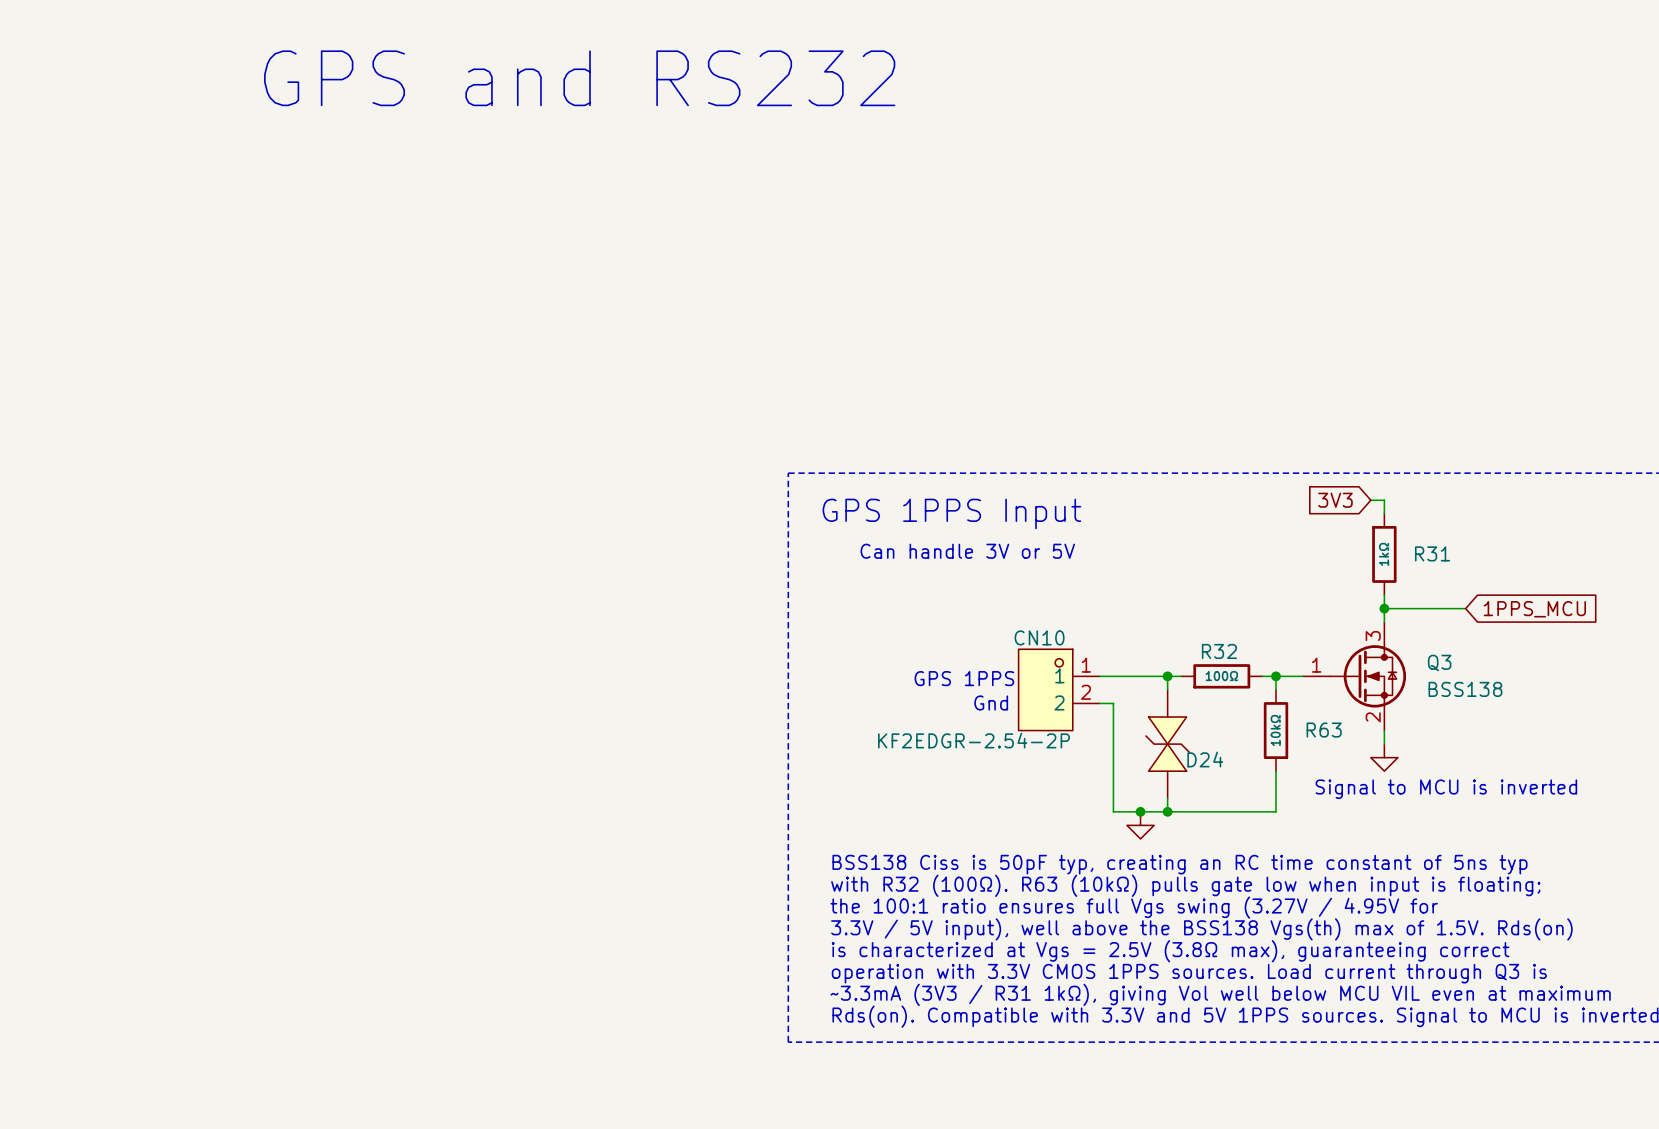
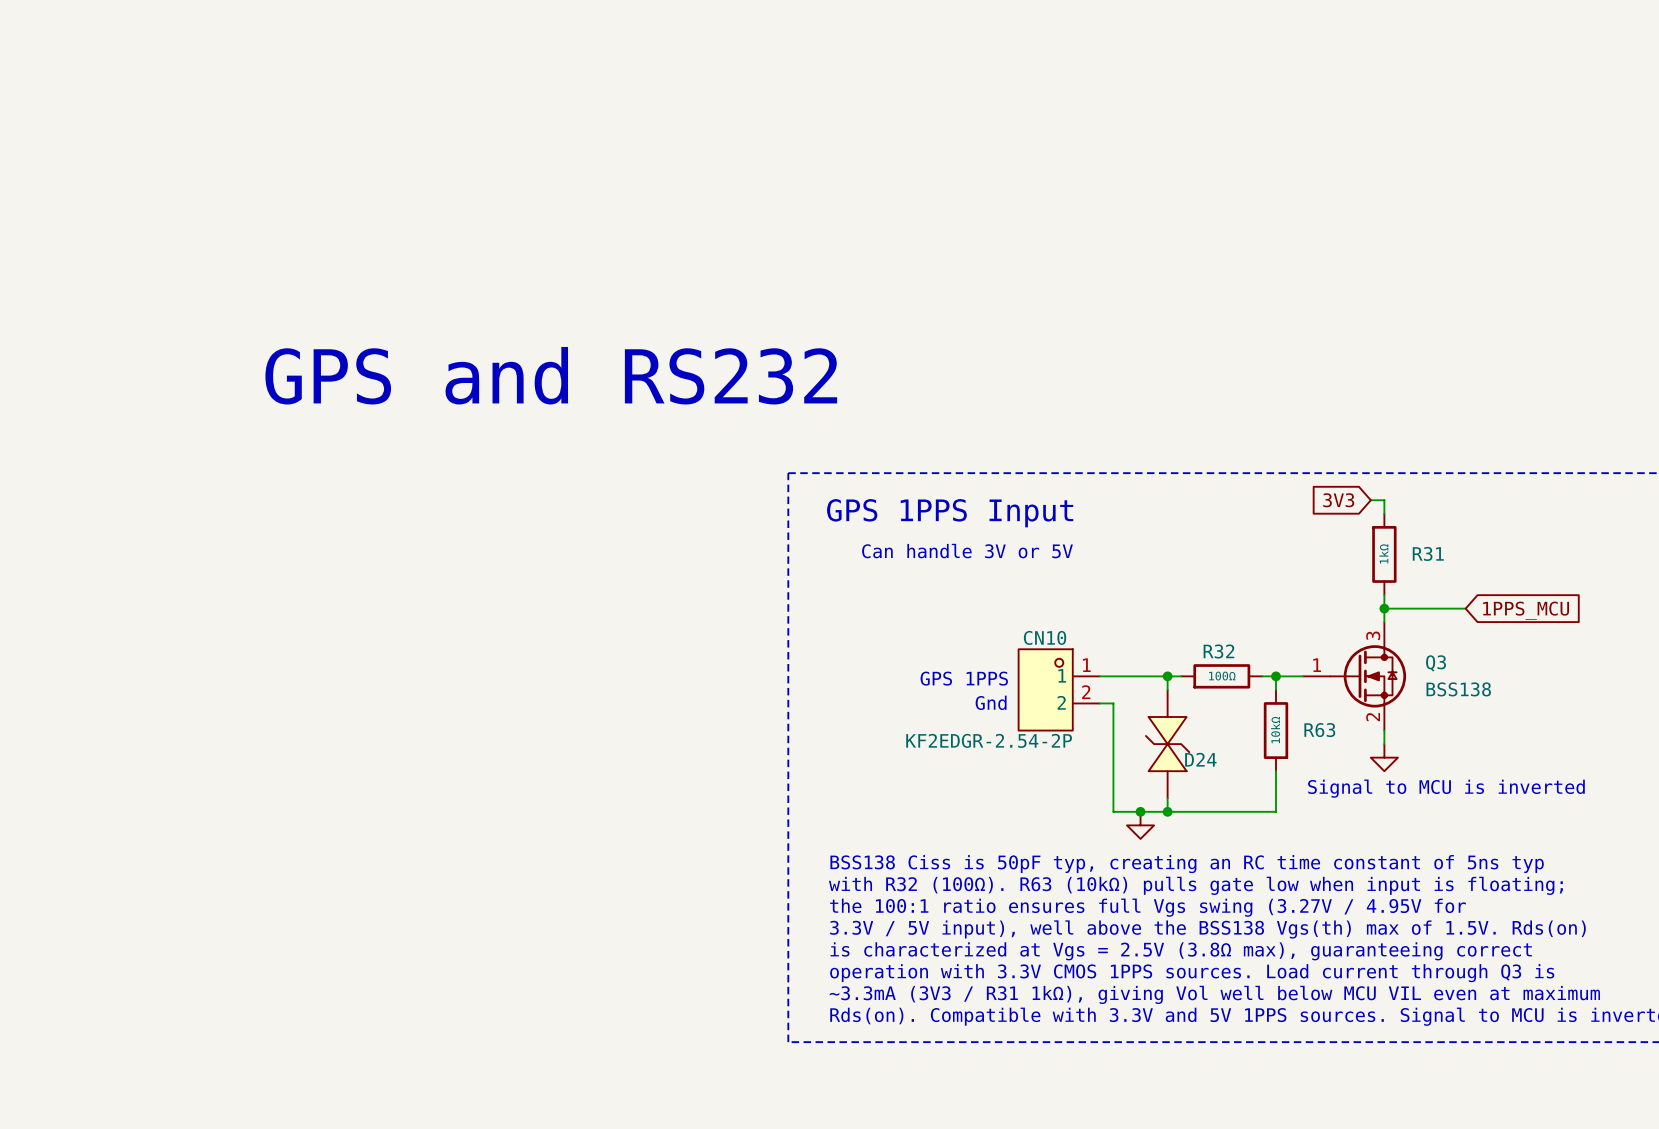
text: GPS and RS232 (579, 78) -> none
text: none -> GPS and RS232 (551, 375)

